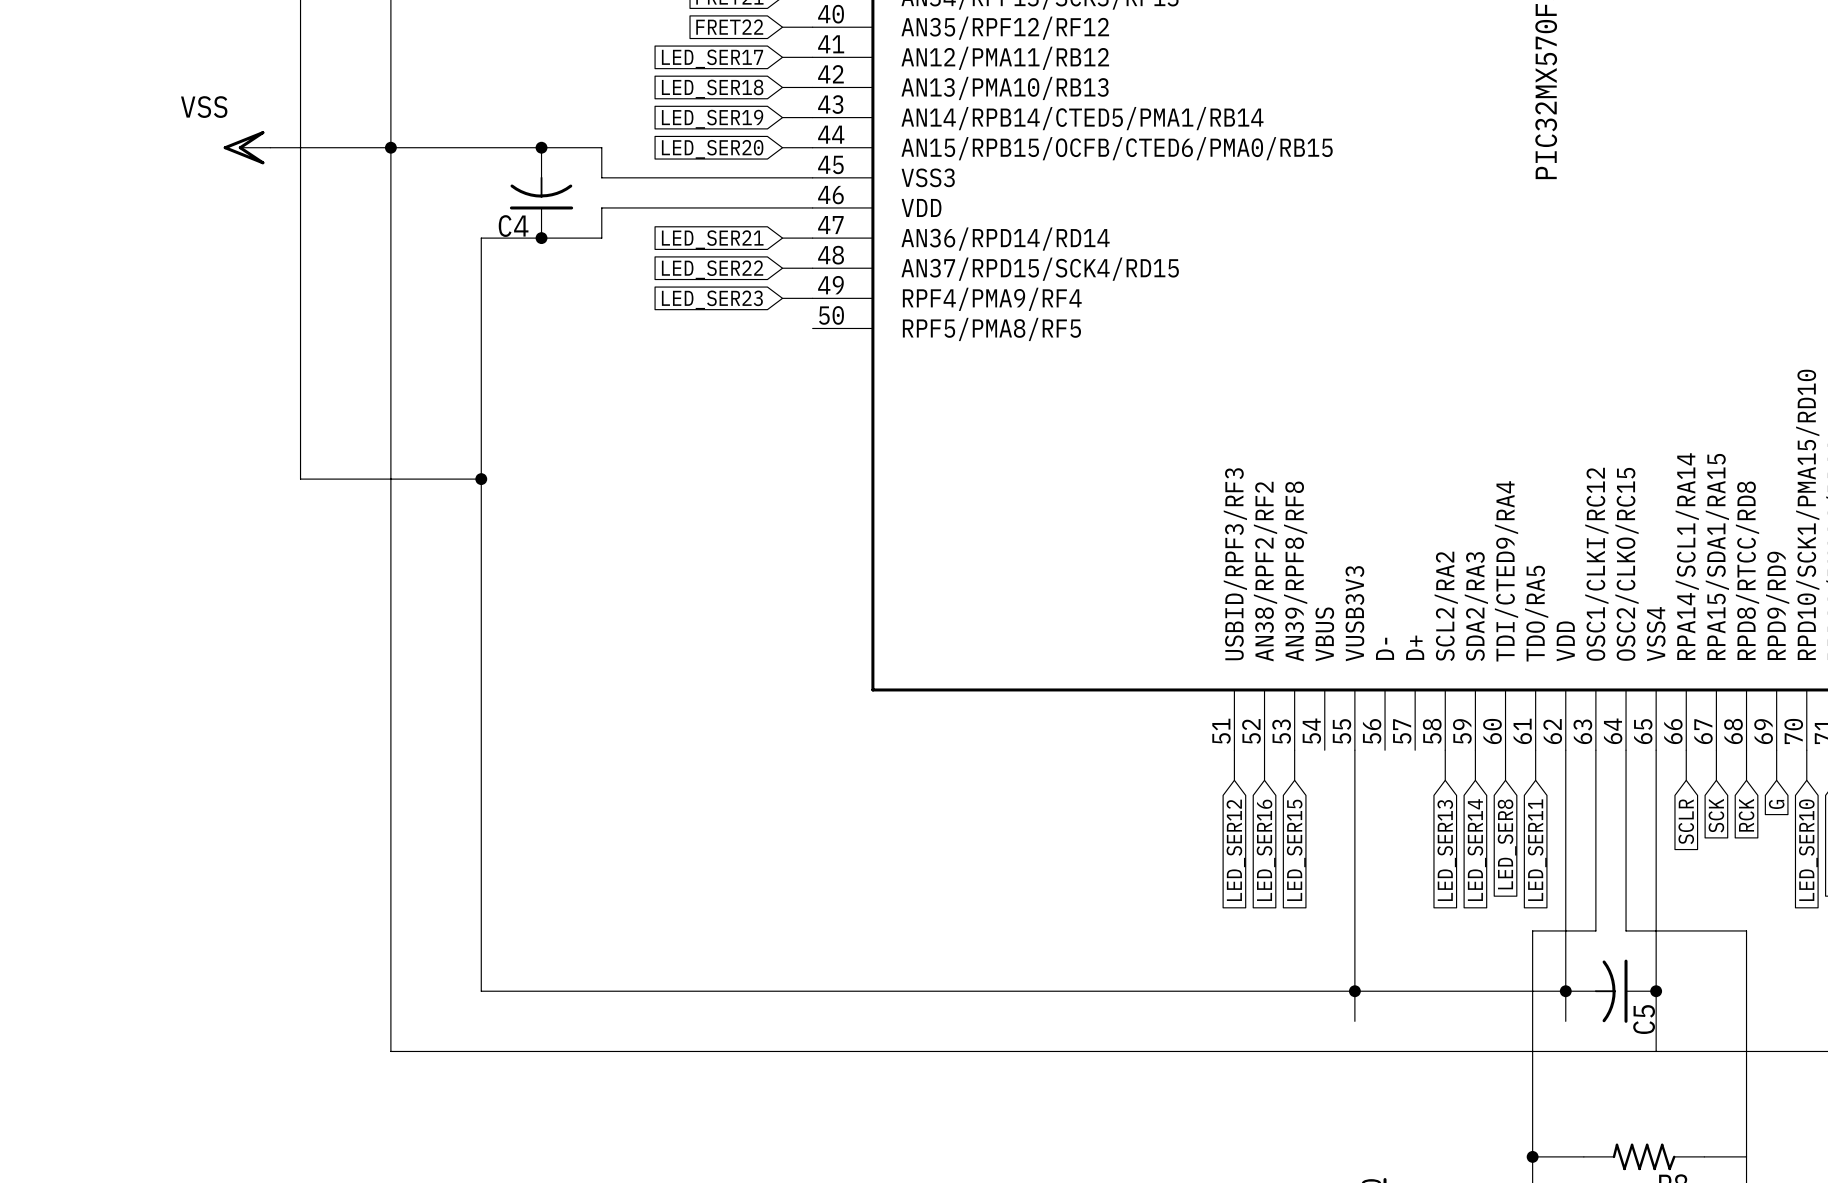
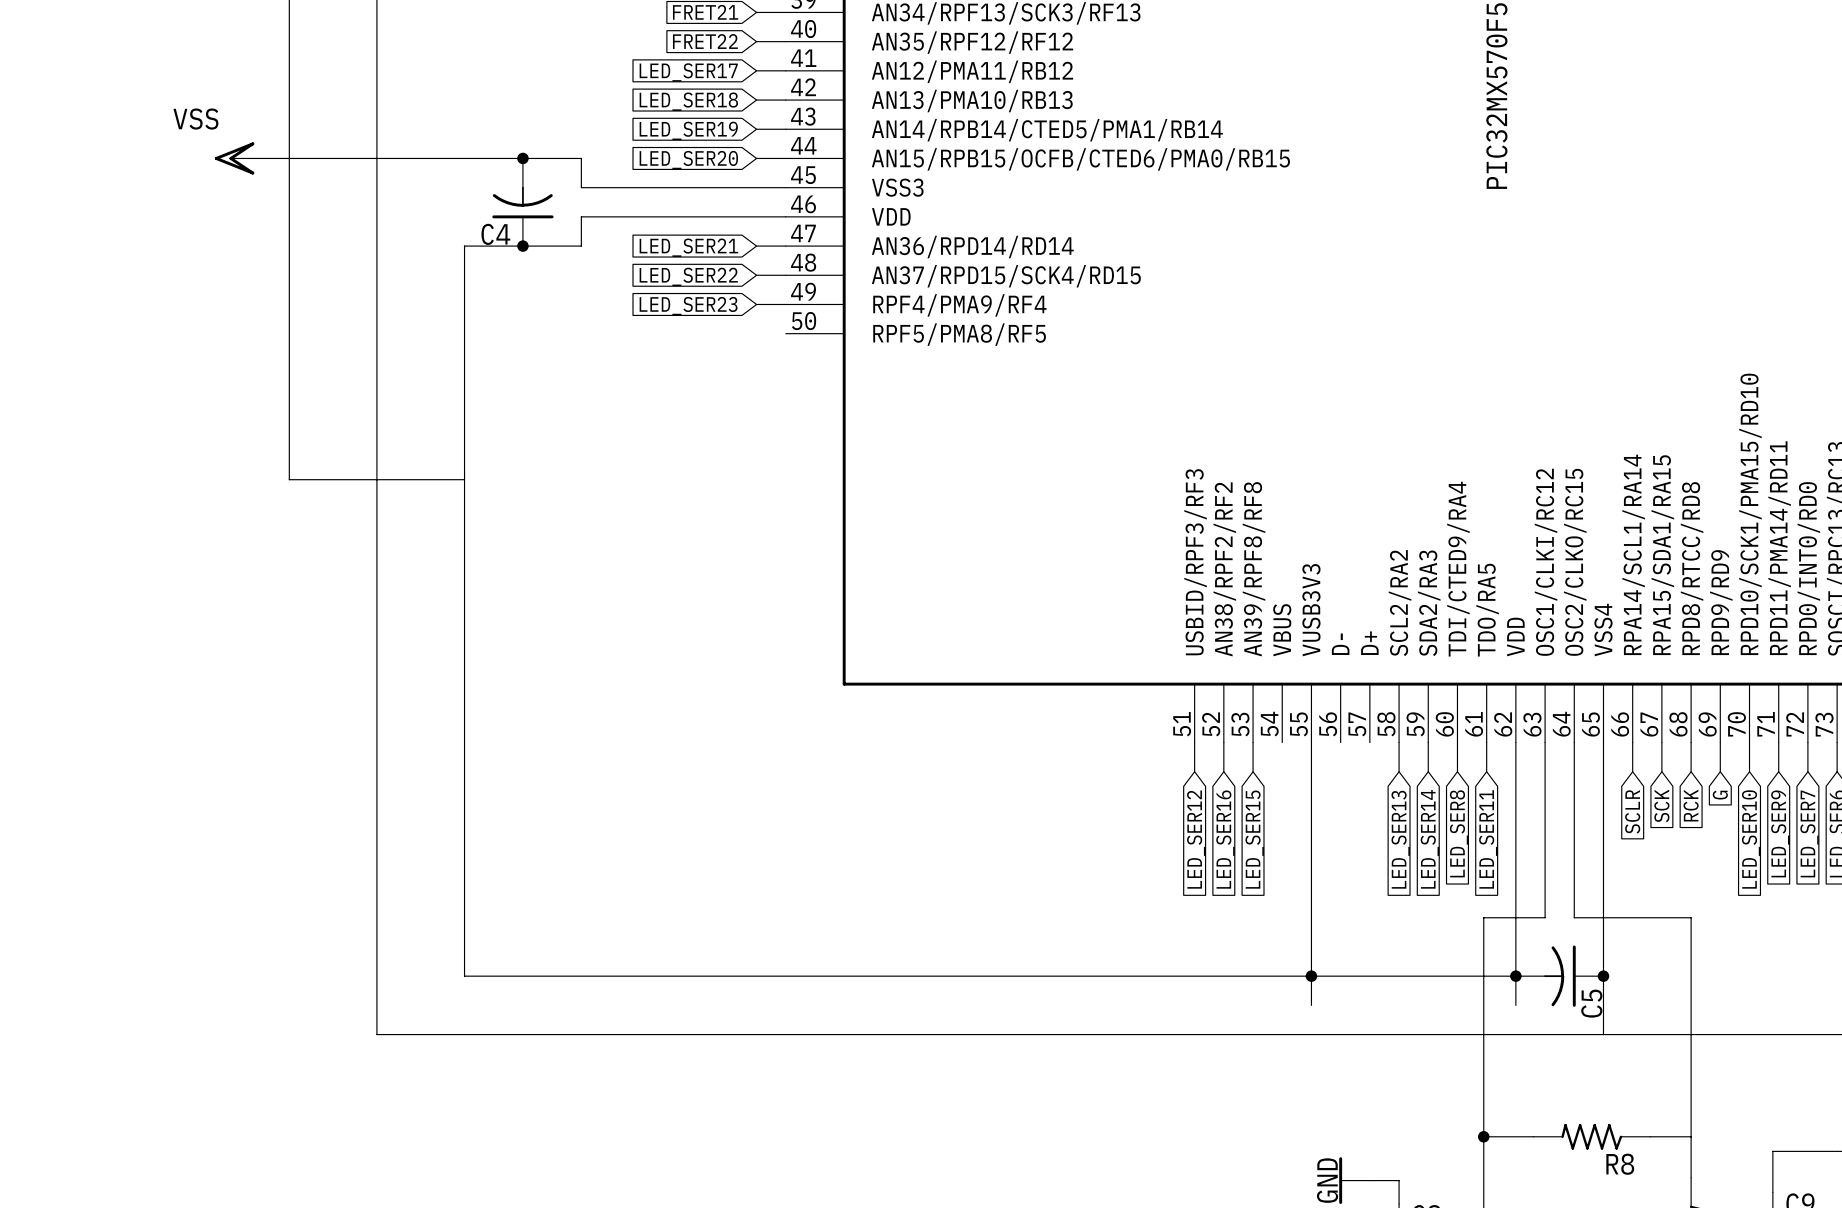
junction: (390, 147) -> none
junction: (481, 479) -> none

